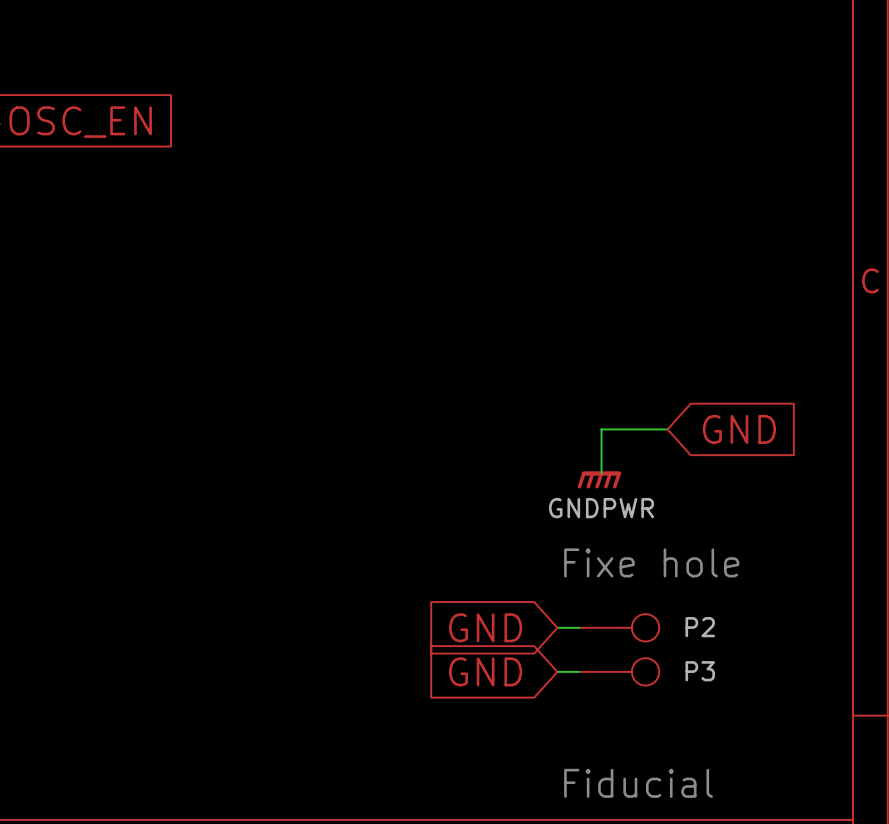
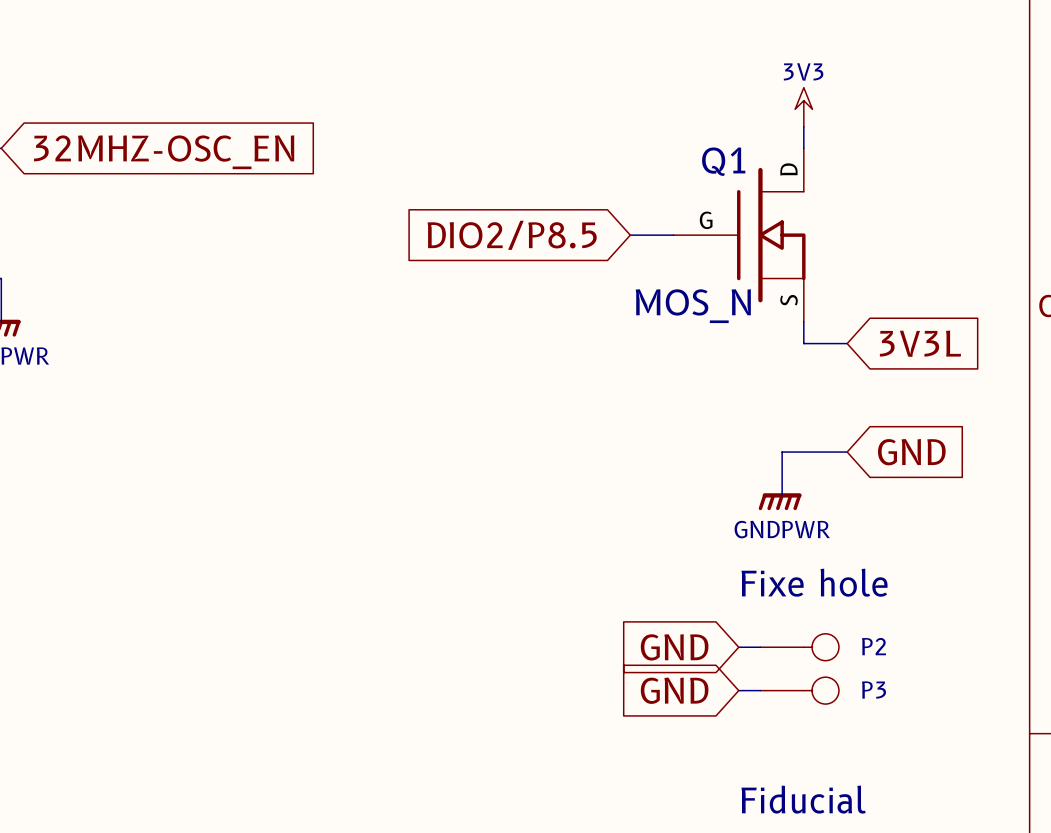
power symbol: none -> 3V3 (803, 107)
wire: none -> (803, 126) (803, 148)
wire: none -> (630, 235) (673, 235)
Q1: none -> MOS_N (739, 235)
global label: none -> DIO2/P8.5 (512, 235)
wire: none -> (803, 321) (803, 343) (847, 343)
global label: none -> 3V3L (920, 343)

